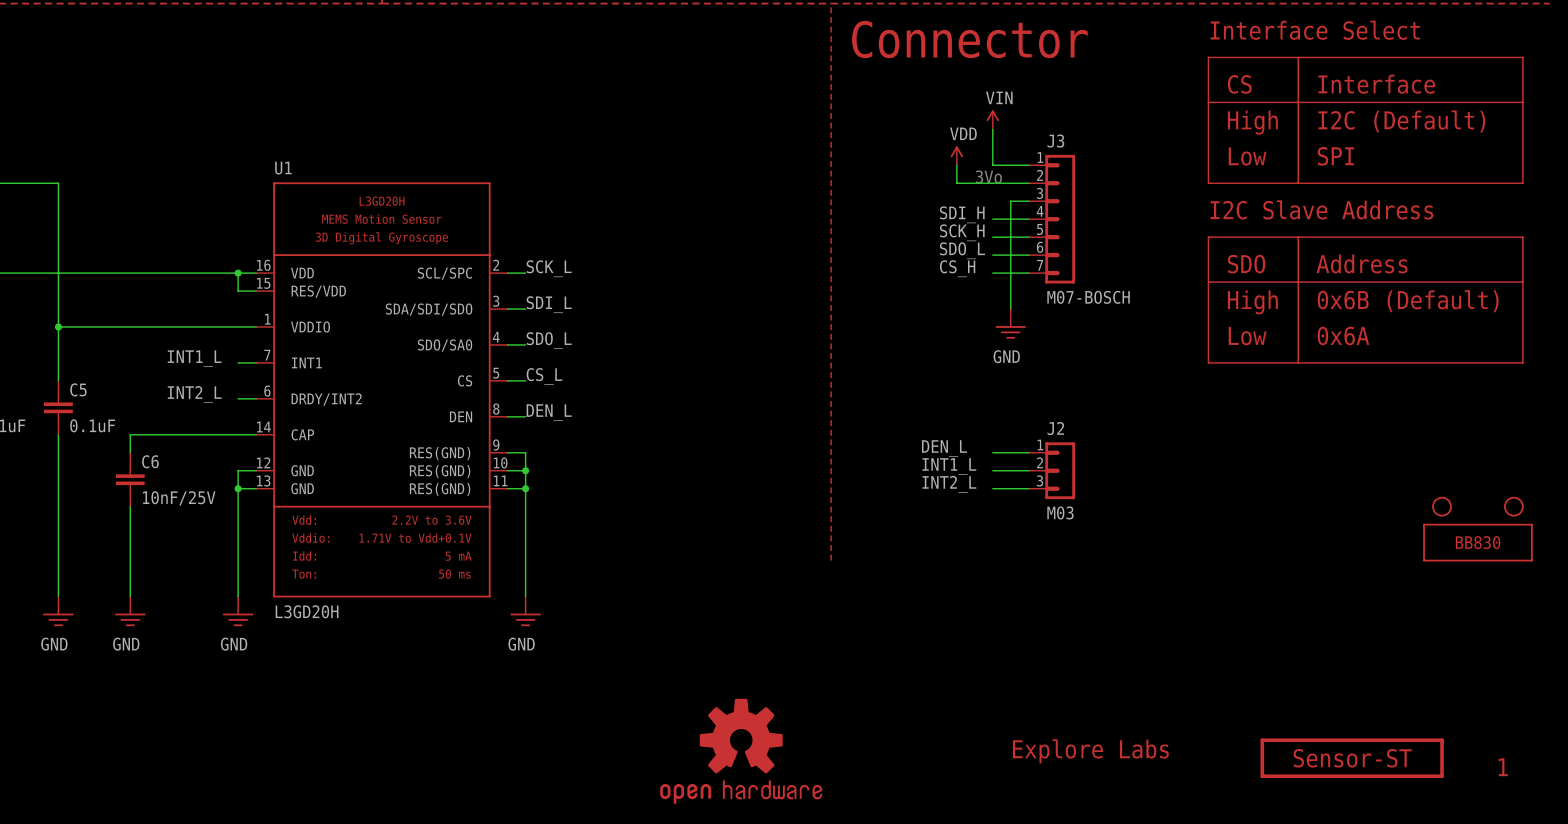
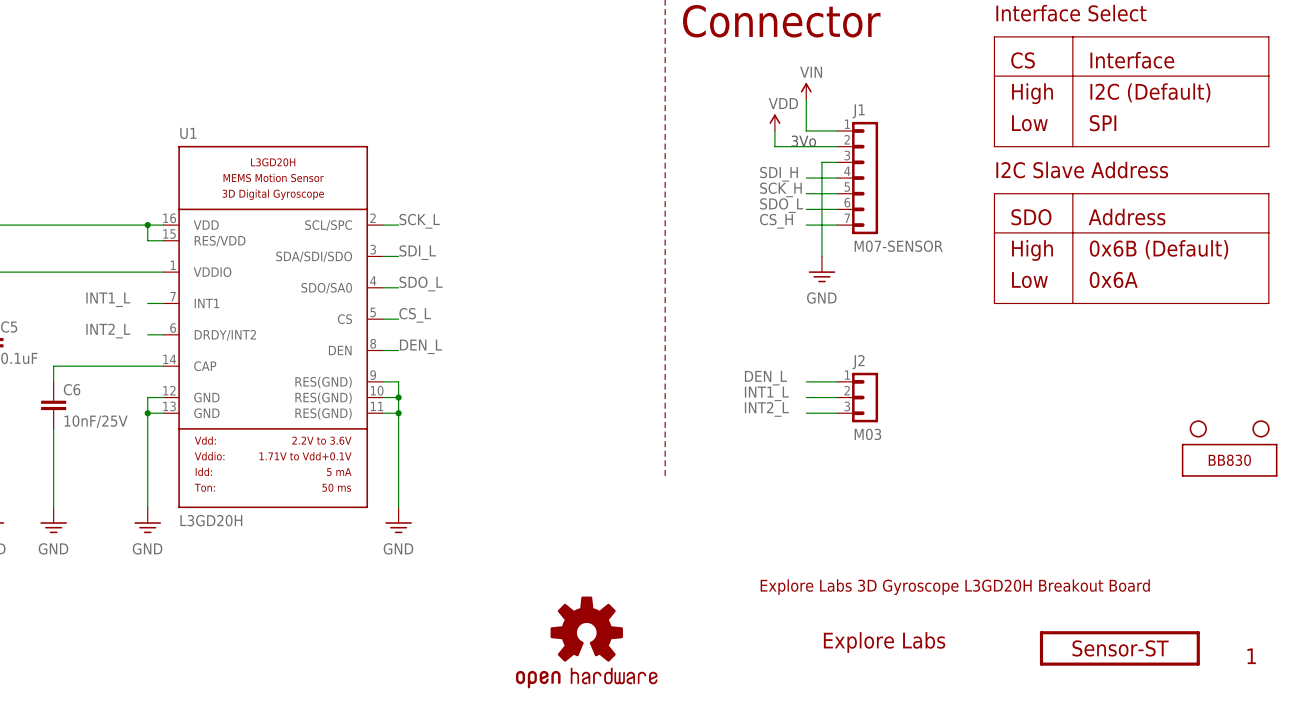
J3 name: J3 (1055, 141) -> J1 (858, 111)
J3 value: M07-BOSCH (1088, 297) -> M07-SENSOR (898, 246)
text: none -> Explore Labs 3D Gyroscope L3GD20H Breakout Board (955, 587)

